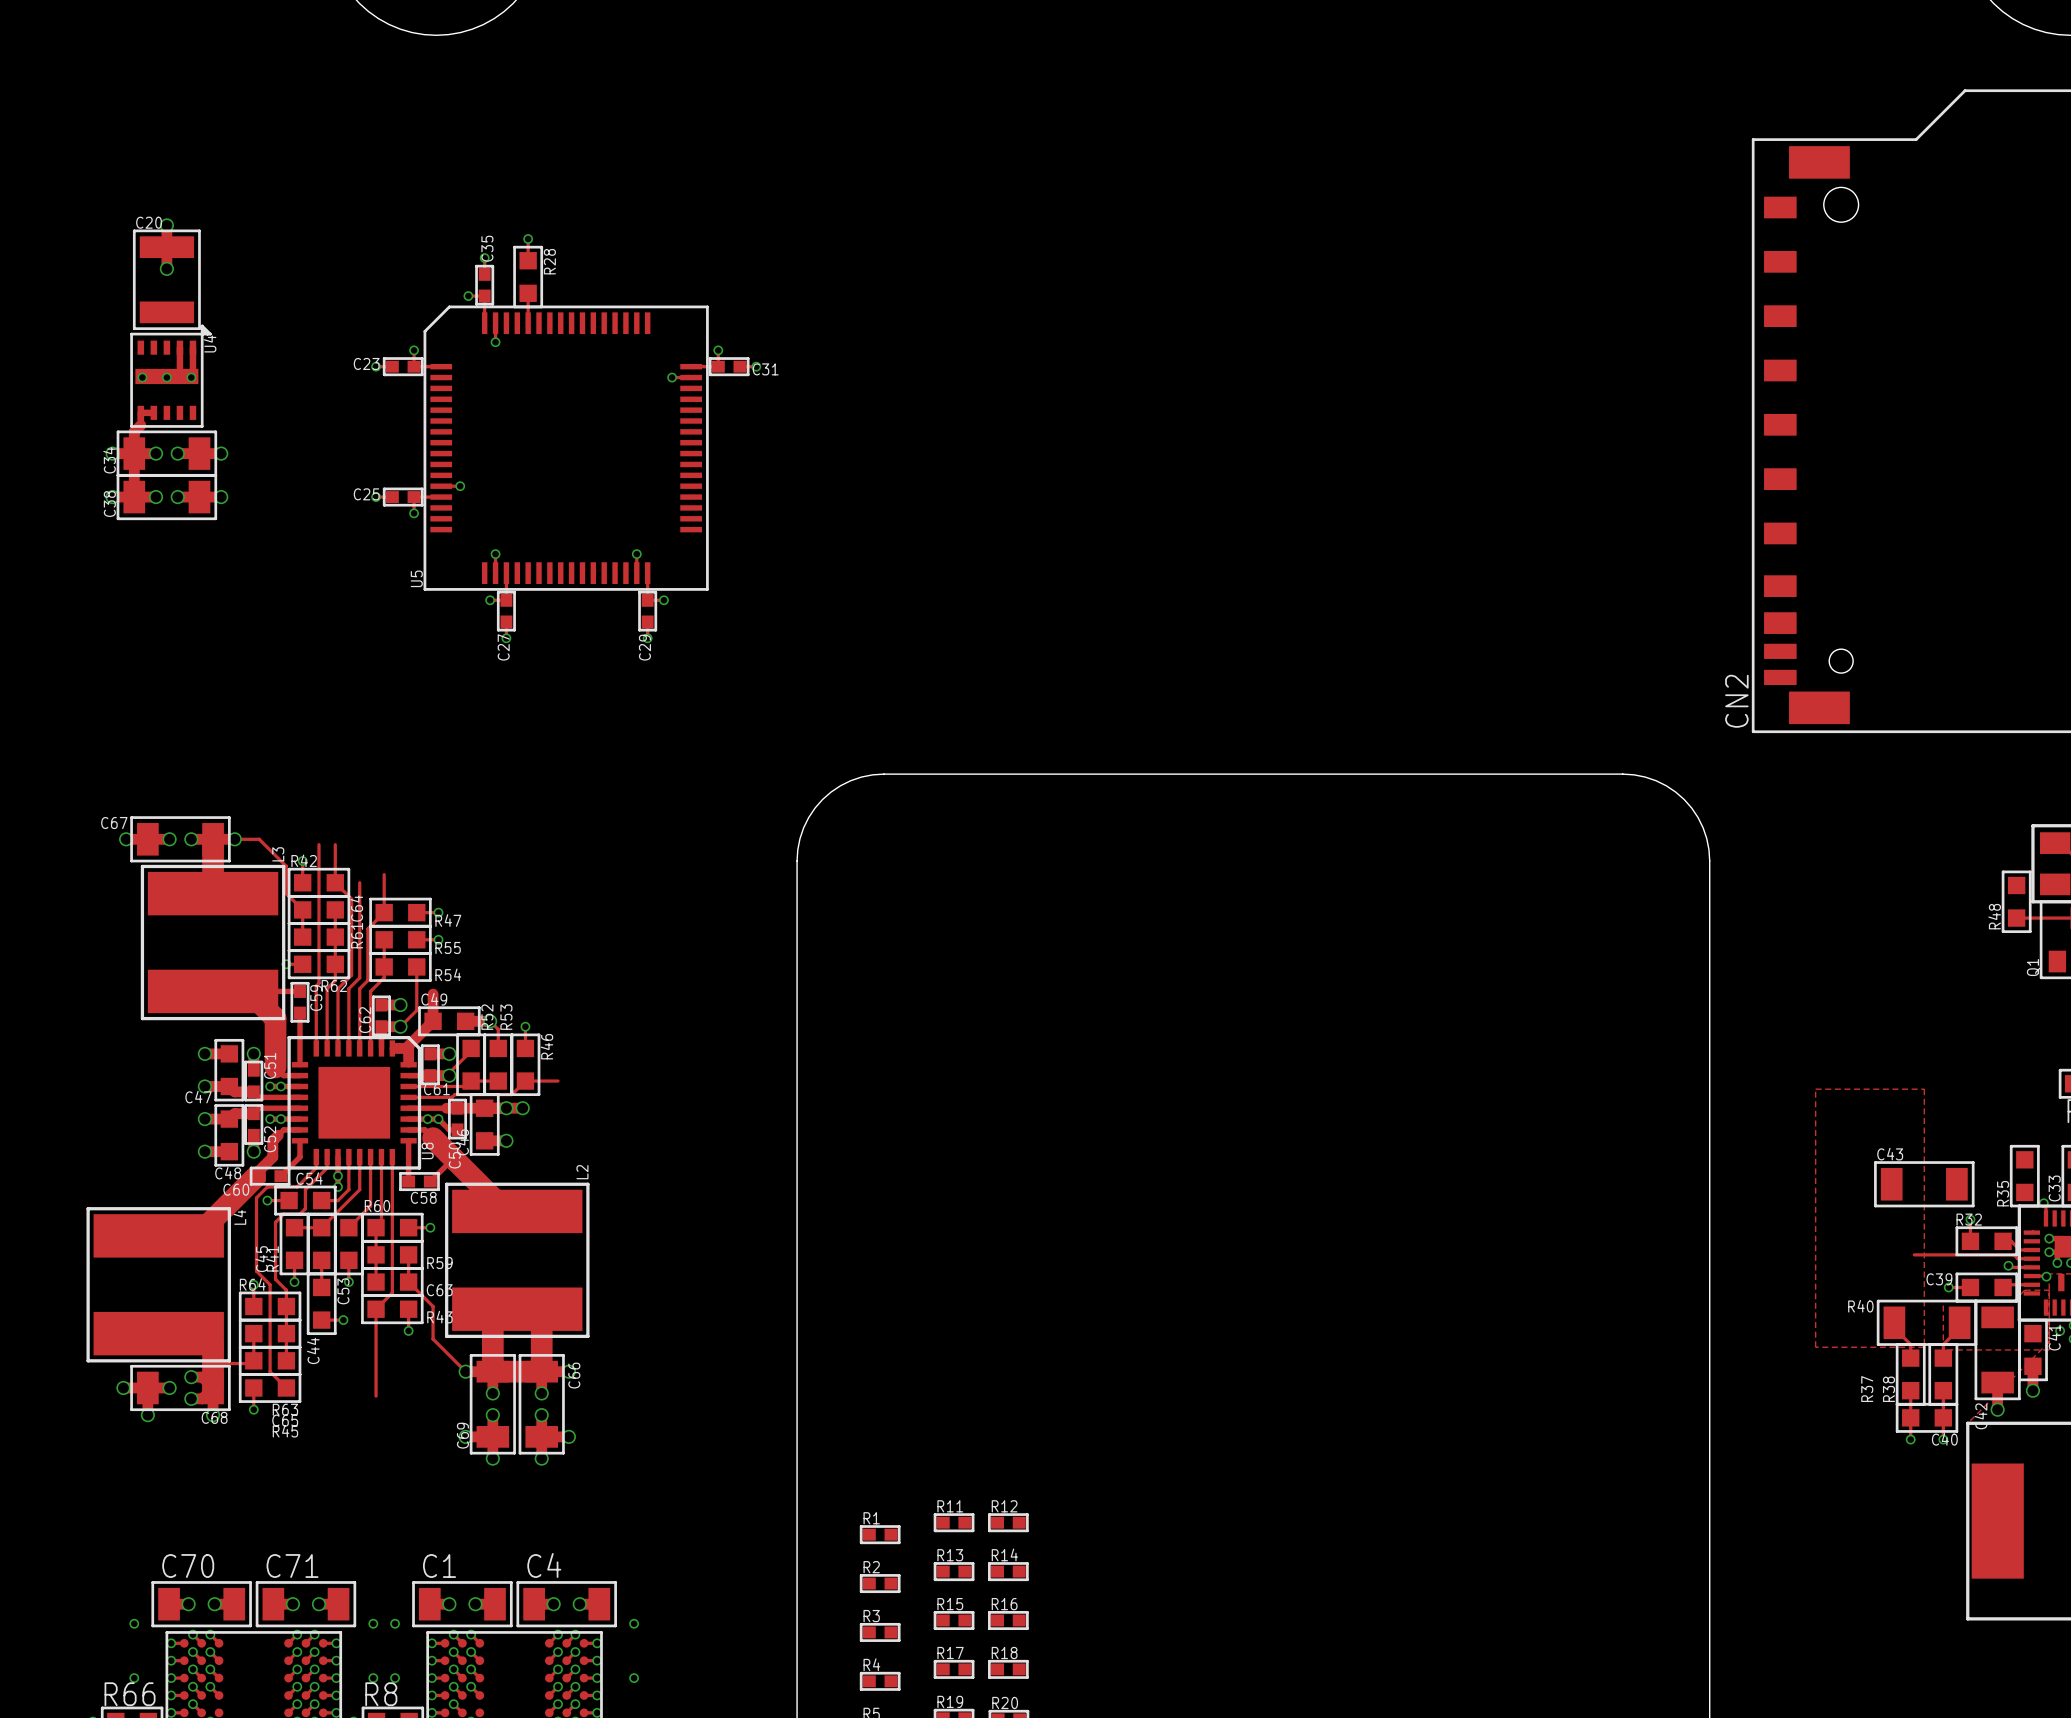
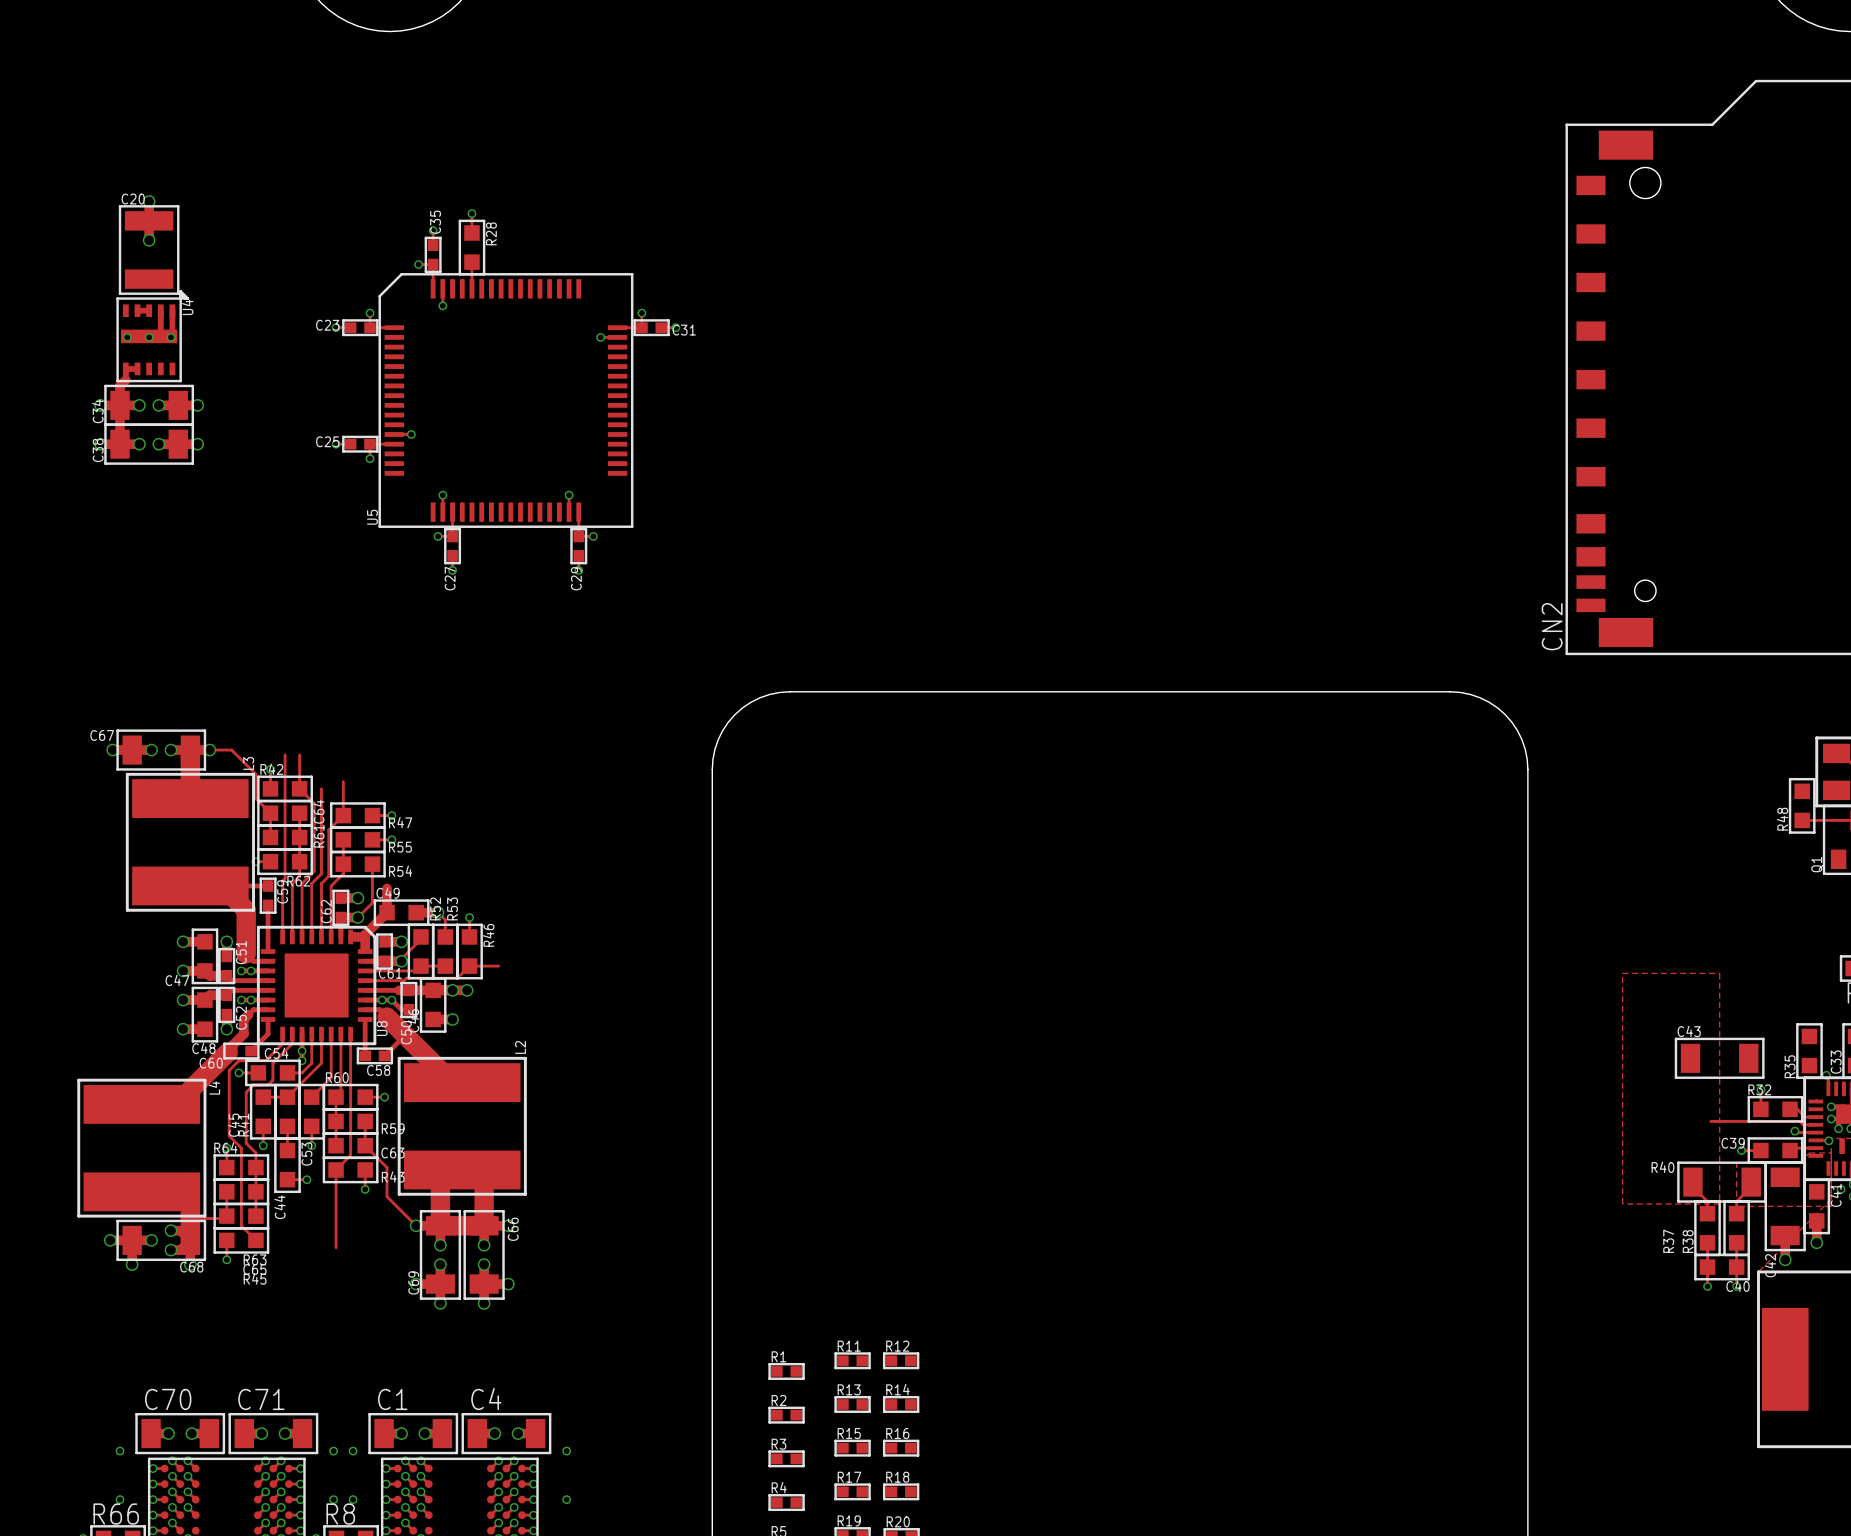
track: none -> (137, 310) (149, 310)

